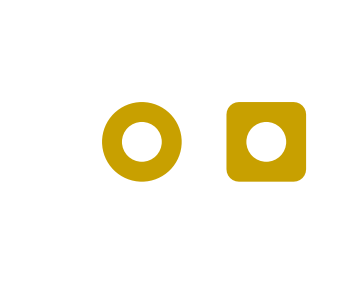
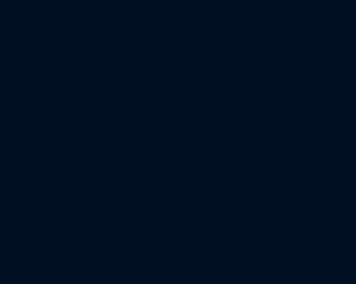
part: (204, 141) -> none

